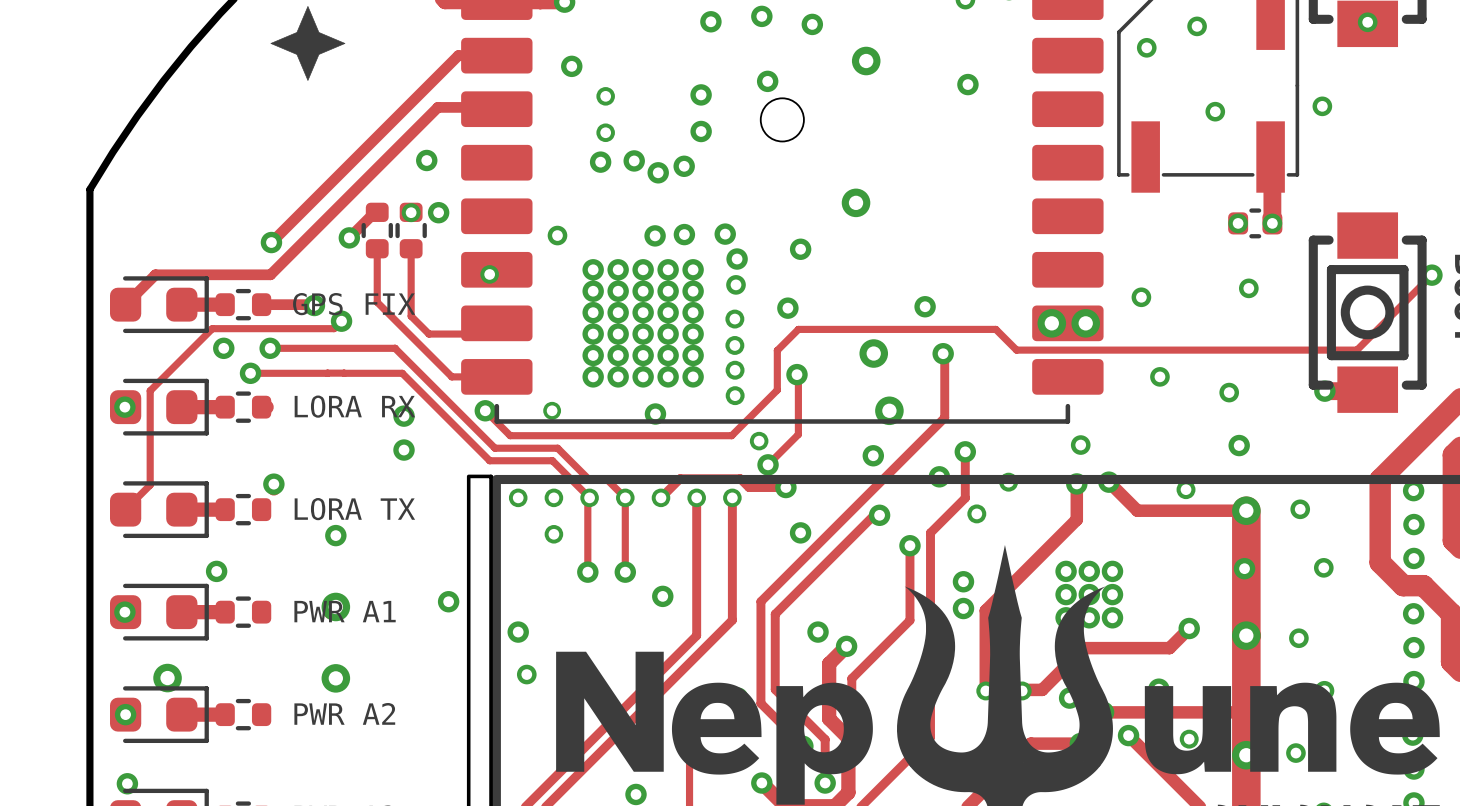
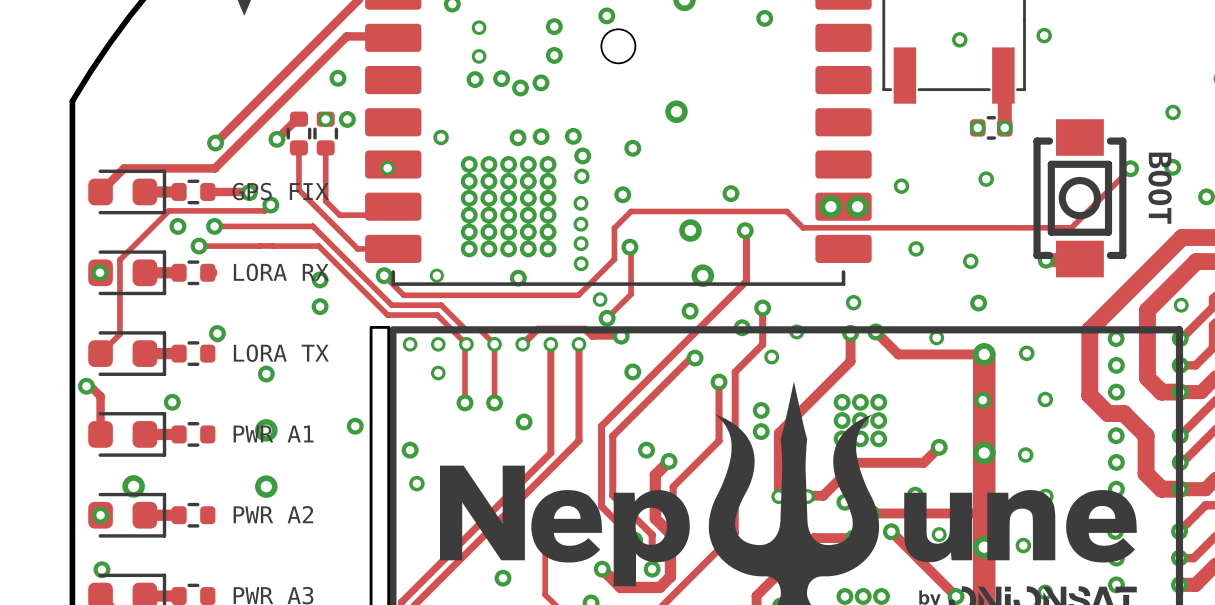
track: none -> (90, 386) (100, 396) (100, 434)
via position: (124, 612) -> (86, 386)

